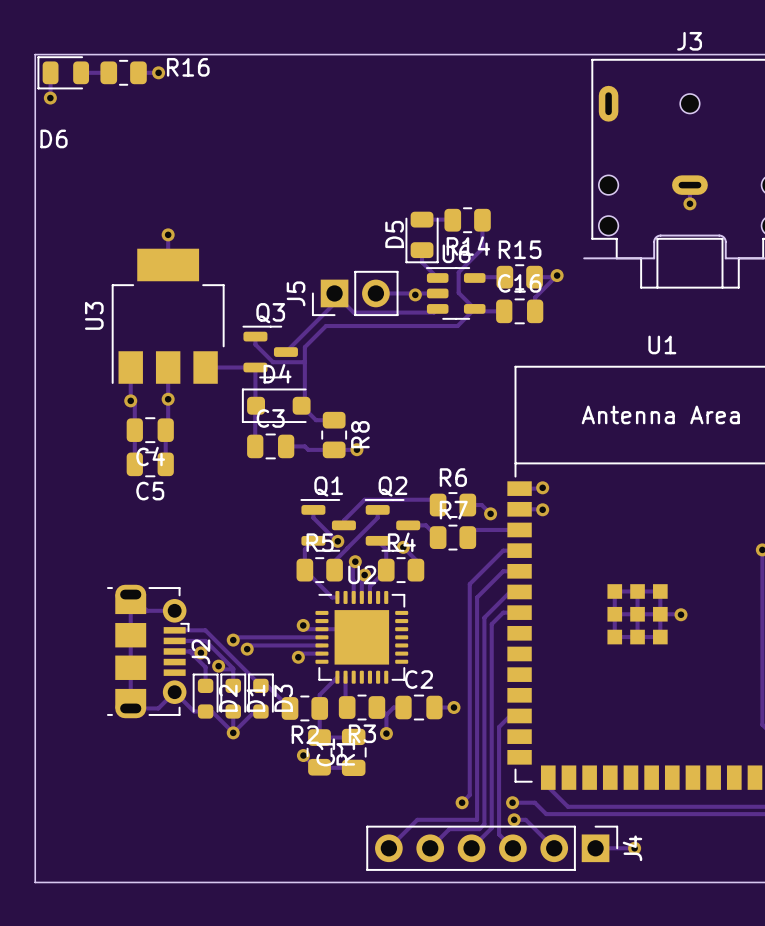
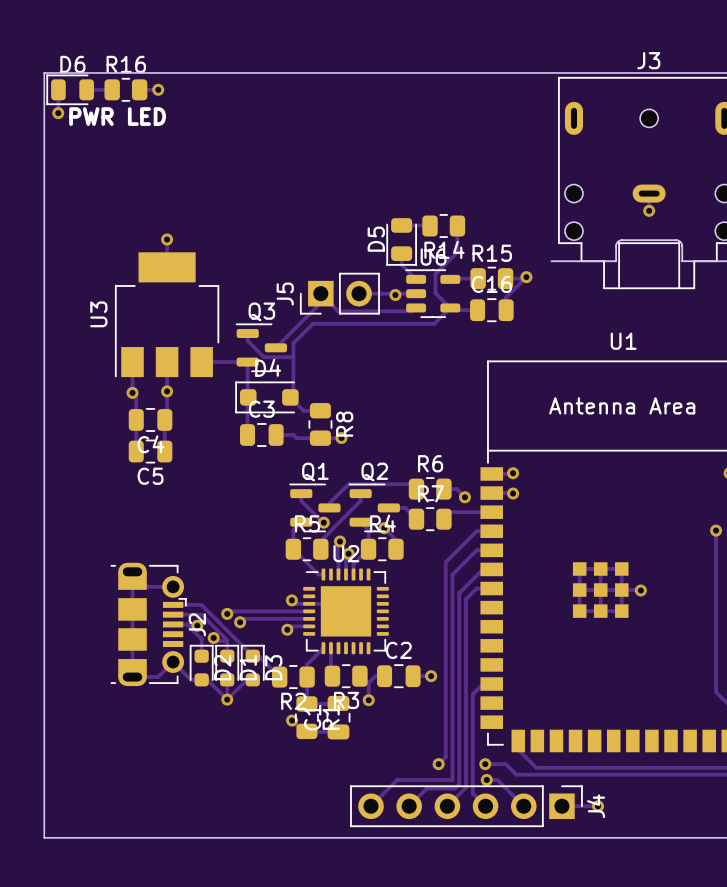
R16 name position: R16 (188, 67) -> R16 (126, 64)
text: none -> PWR LED (117, 116)
D6 name position: D6 (54, 138) -> D6 (72, 64)

